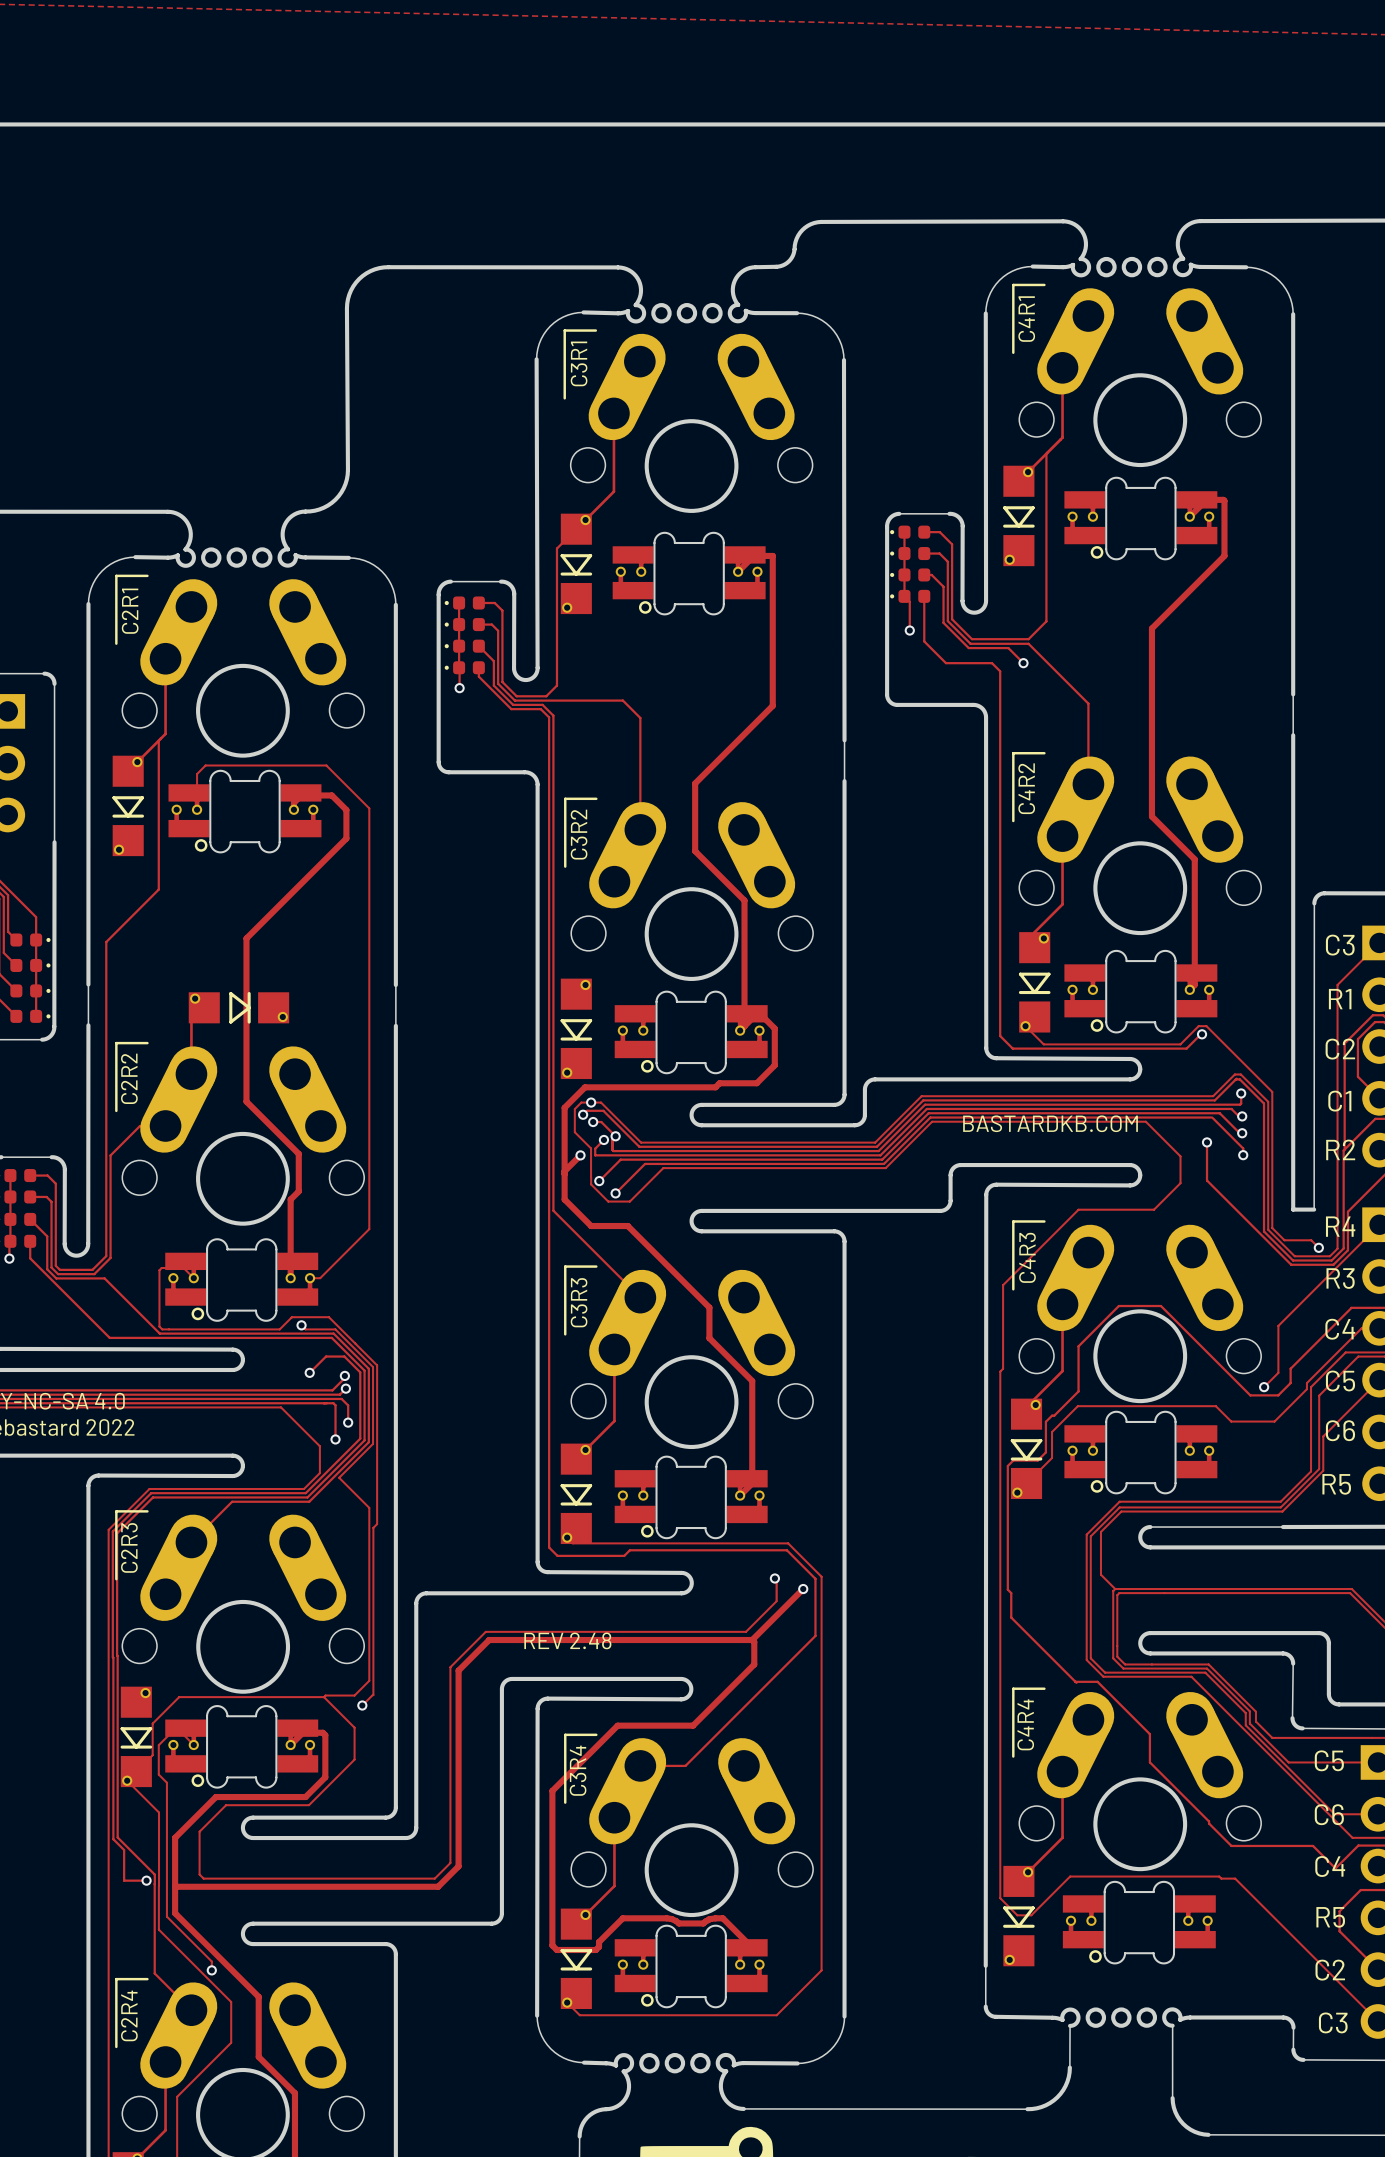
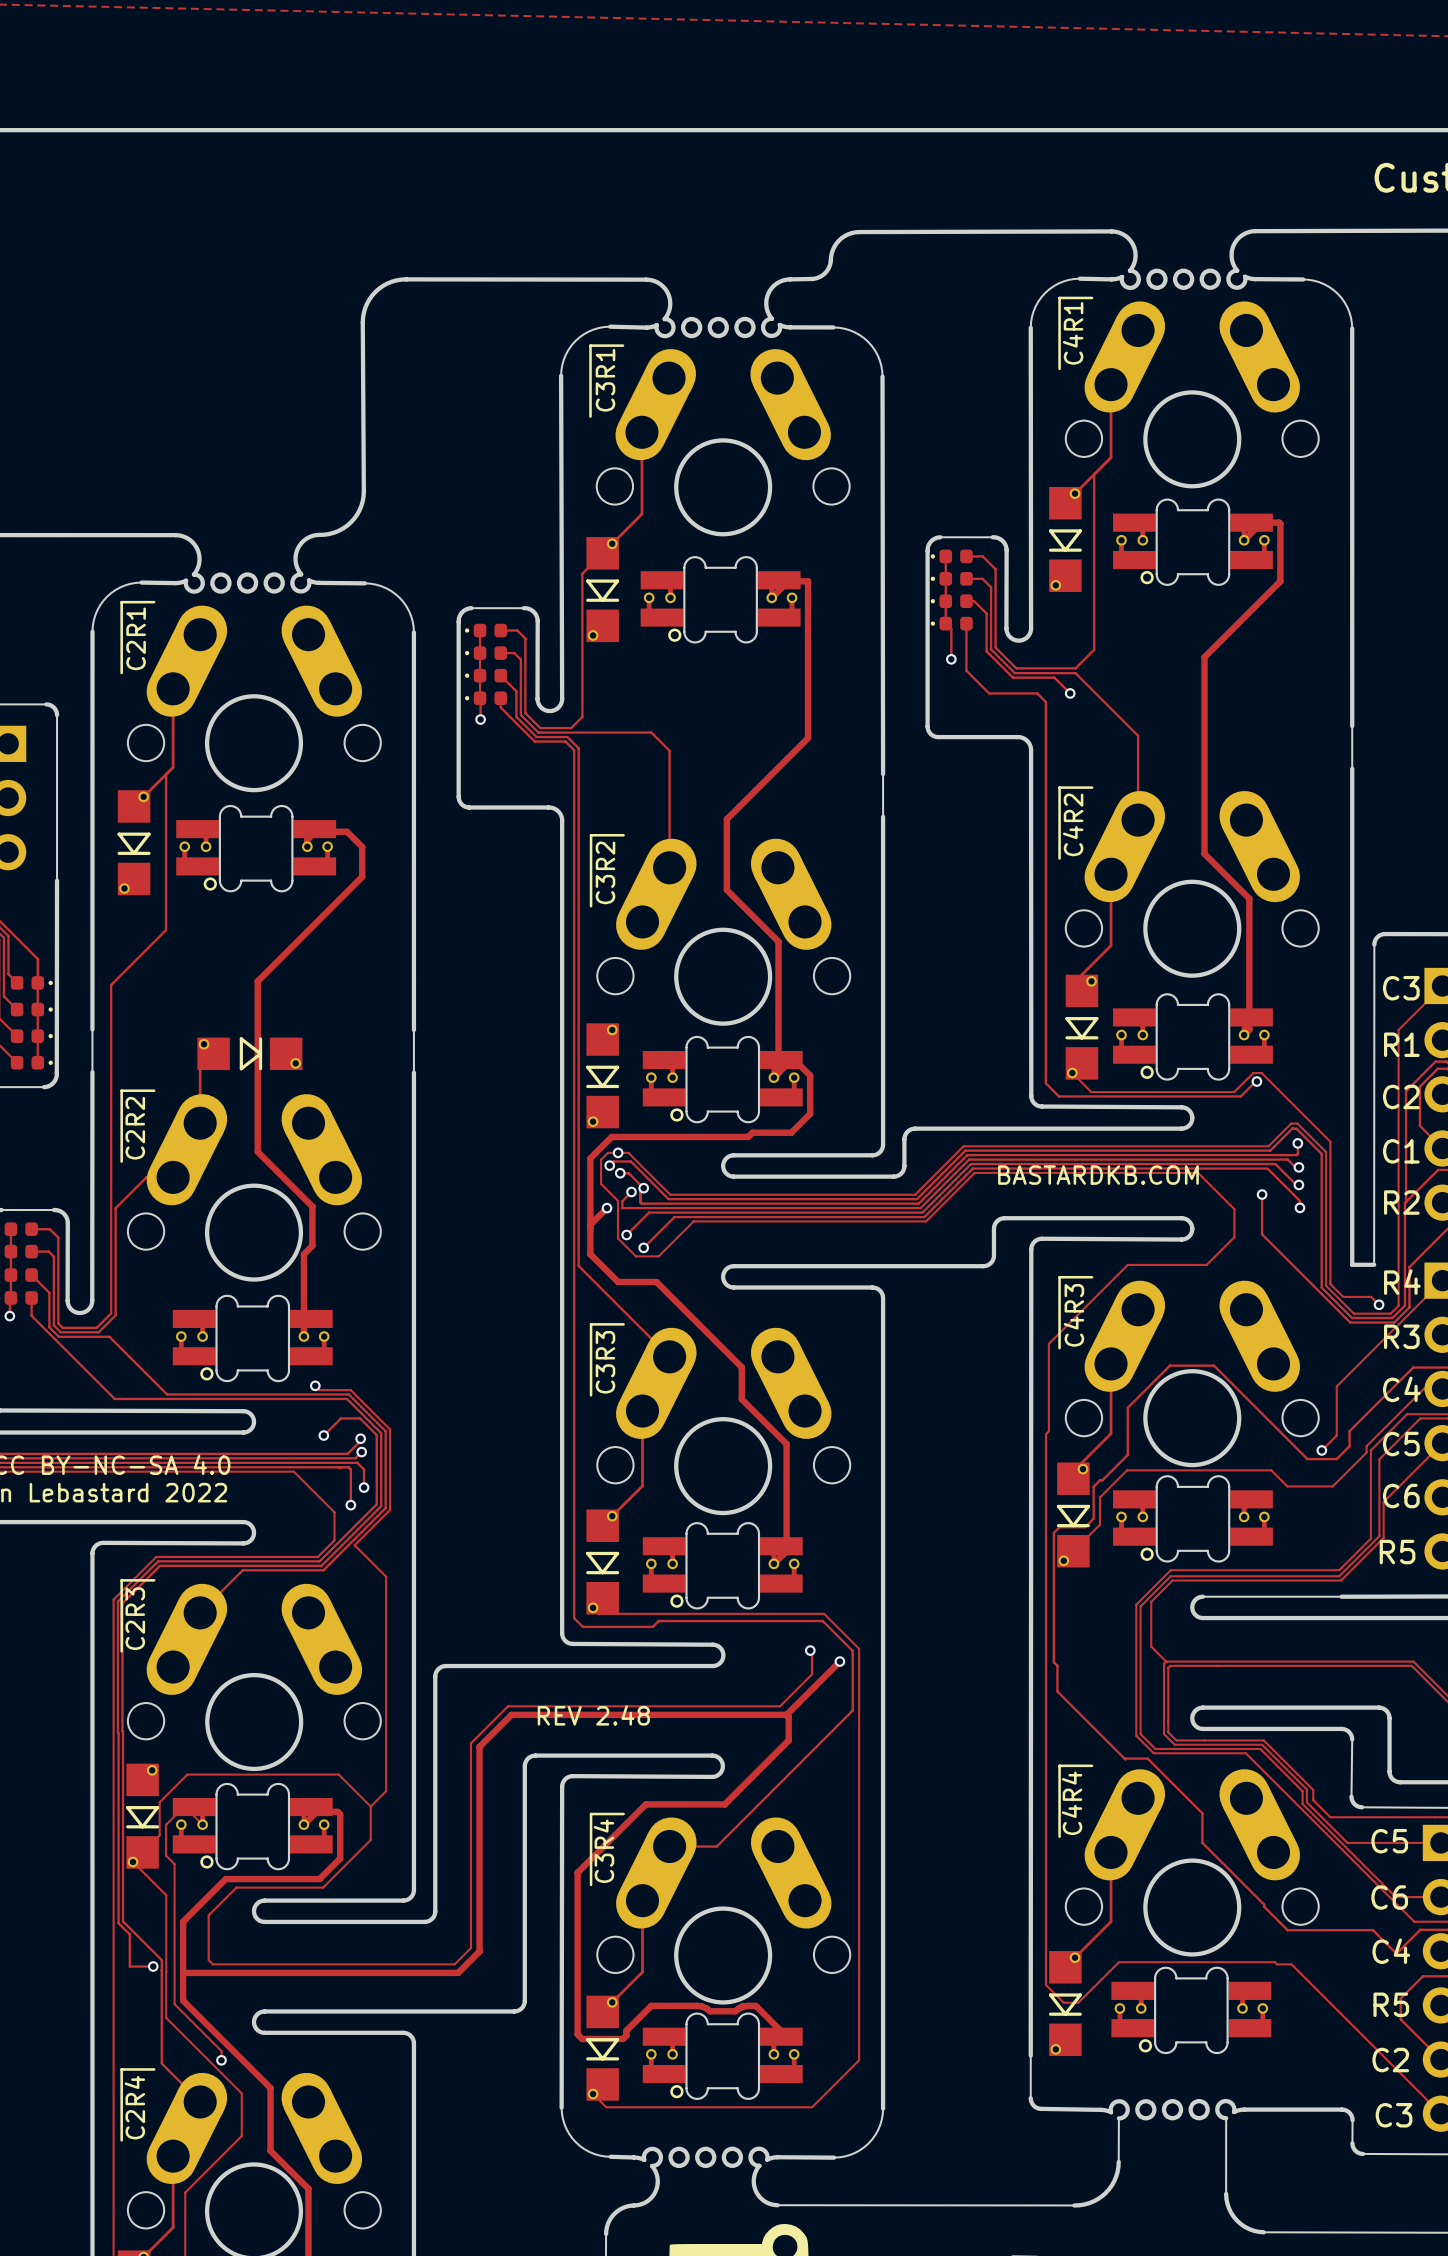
track: (197, 809) (197, 774) (205, 765) (326, 765) (369, 808) (369, 1229) (320, 1278) (310, 1278) -> none
track: (193, 1278) (183, 1267) (161, 1267) (159, 1270) (159, 1326) (162, 1329) (279, 1329) (291, 1317) (328, 1317) (377, 1365) (377, 1524) (373, 1527) (373, 1695) (362, 1705) -> none
track: (369, 1680) (354, 1695) (323, 1697) -> (386, 1757) (386, 1791) (370, 1806)
via: (362, 1705) -> none

